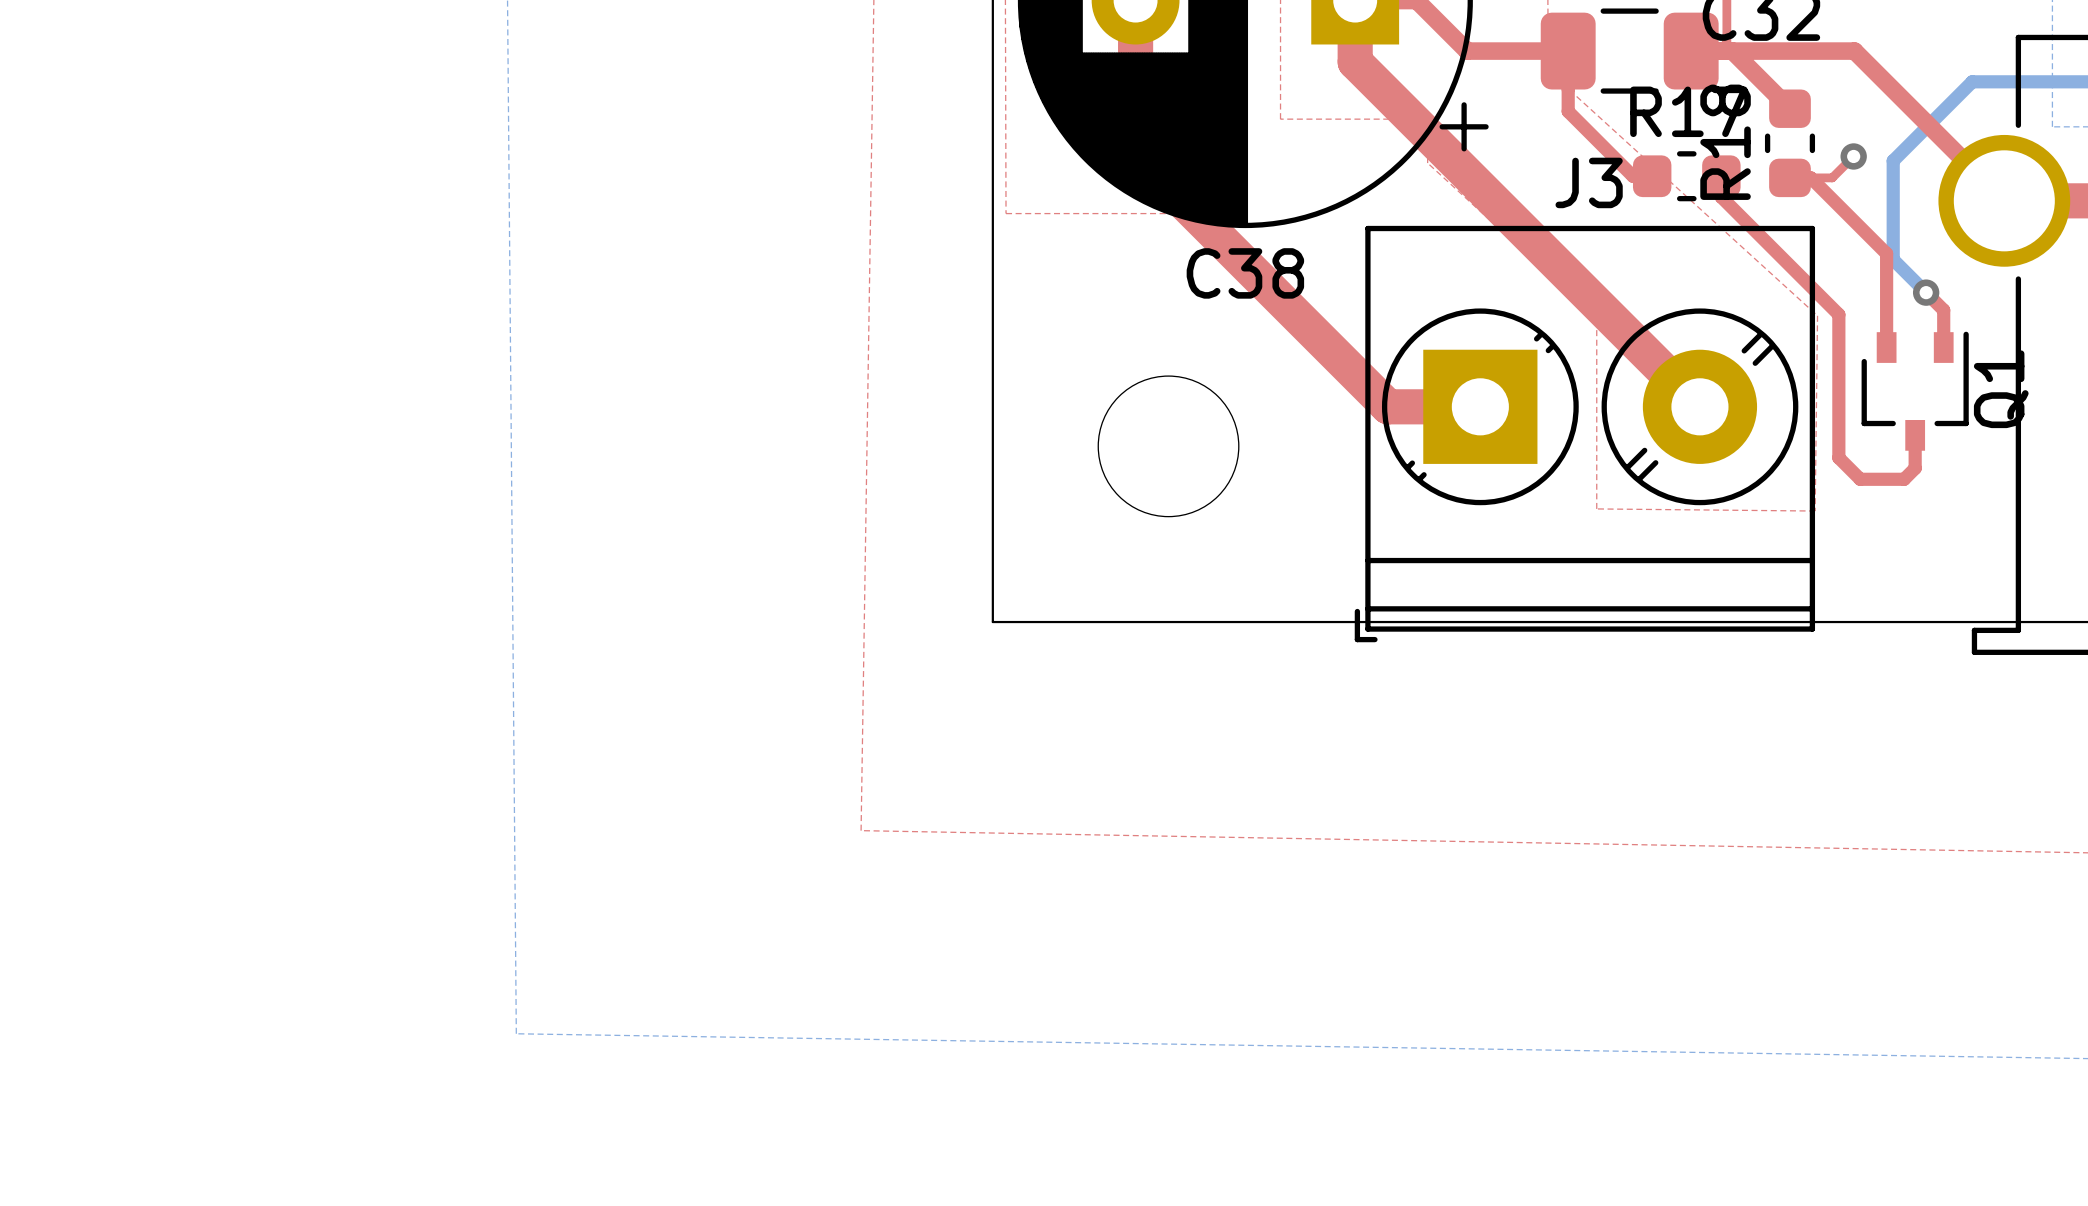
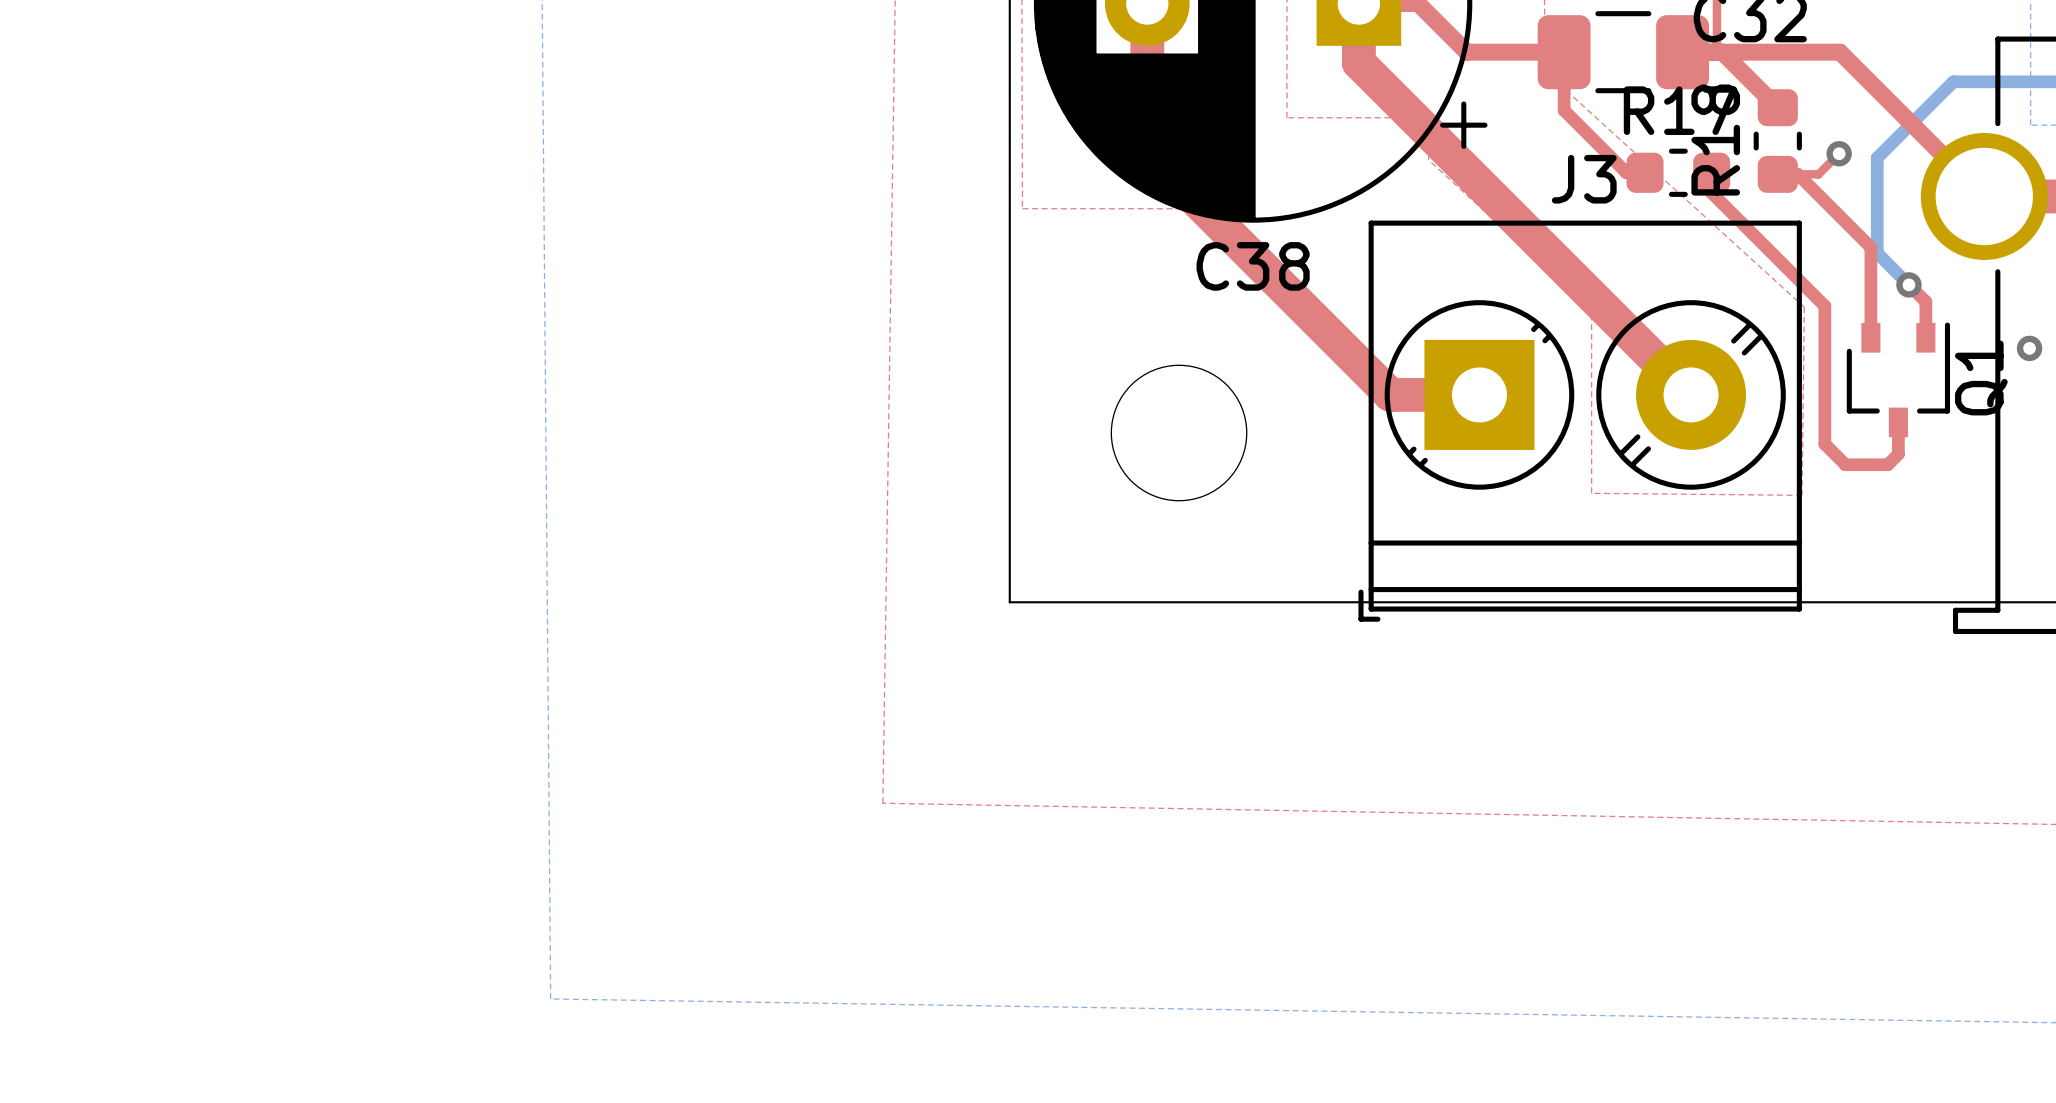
via: none -> (2029, 348)

